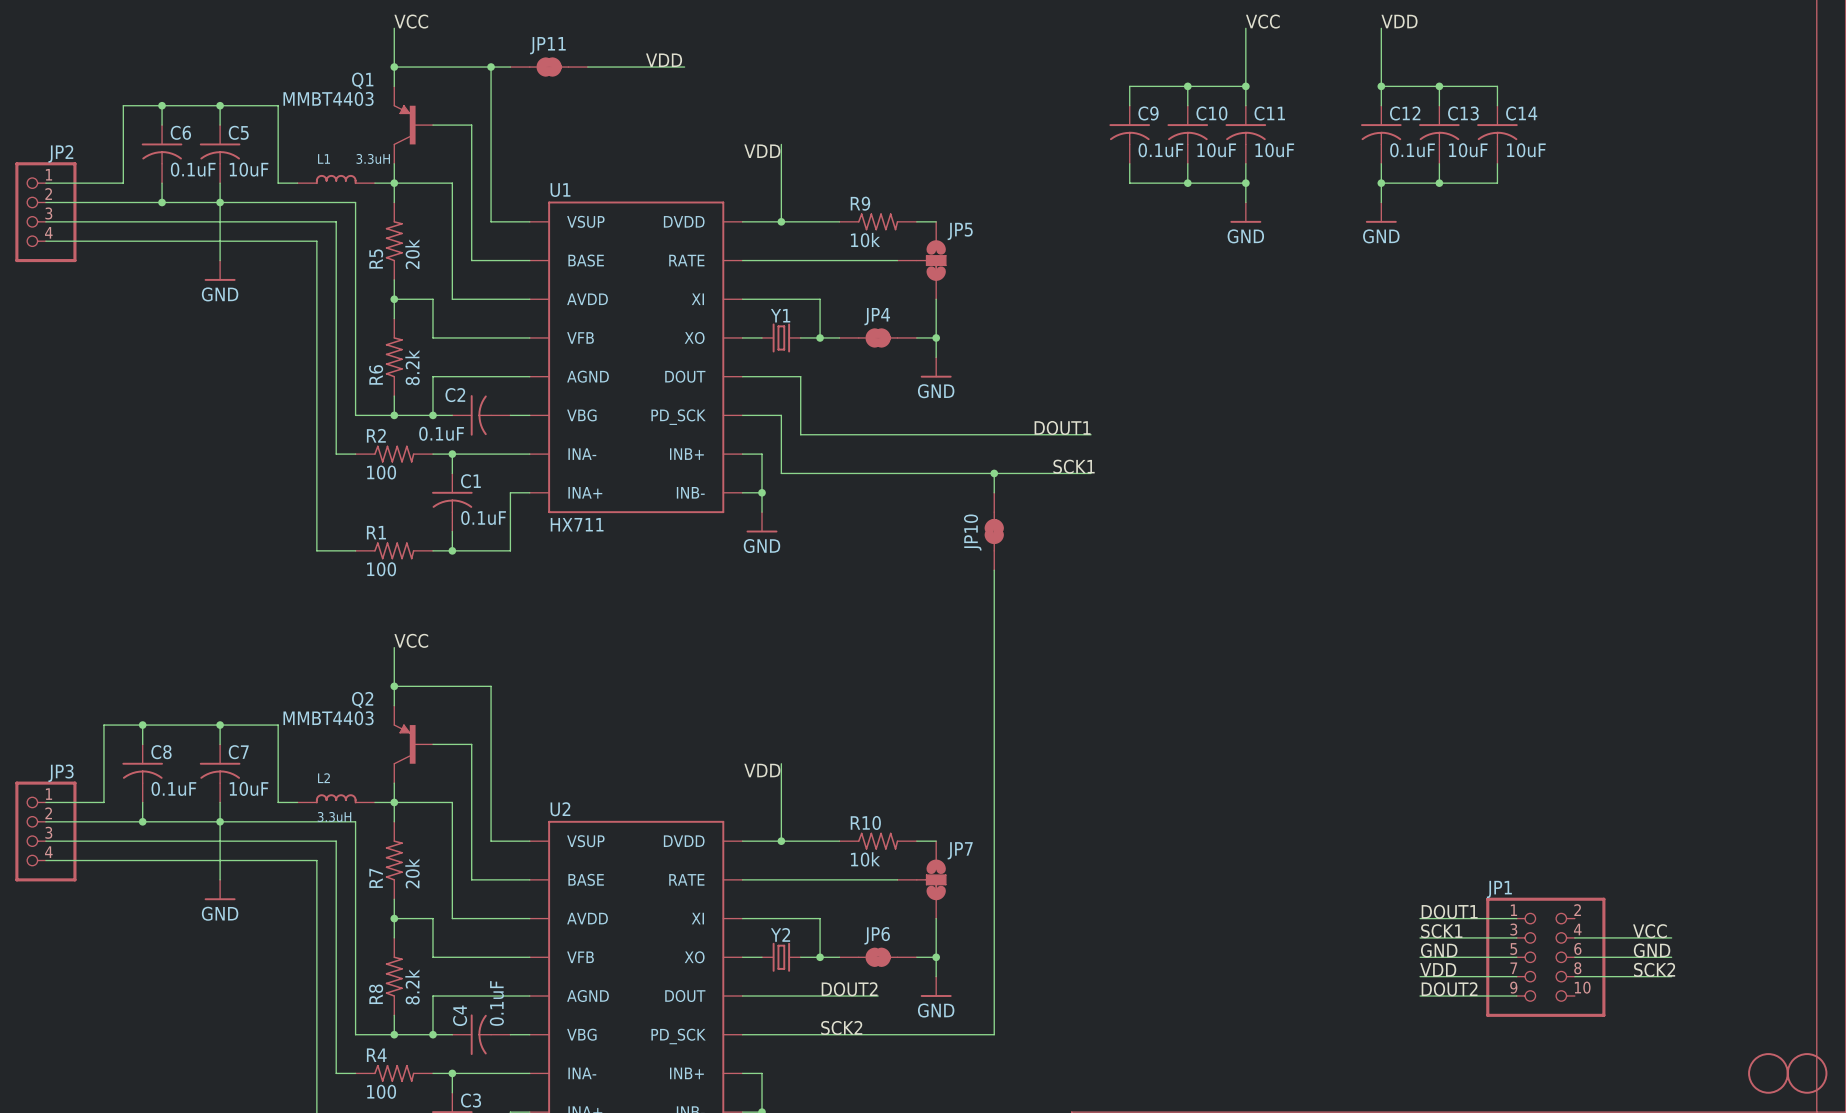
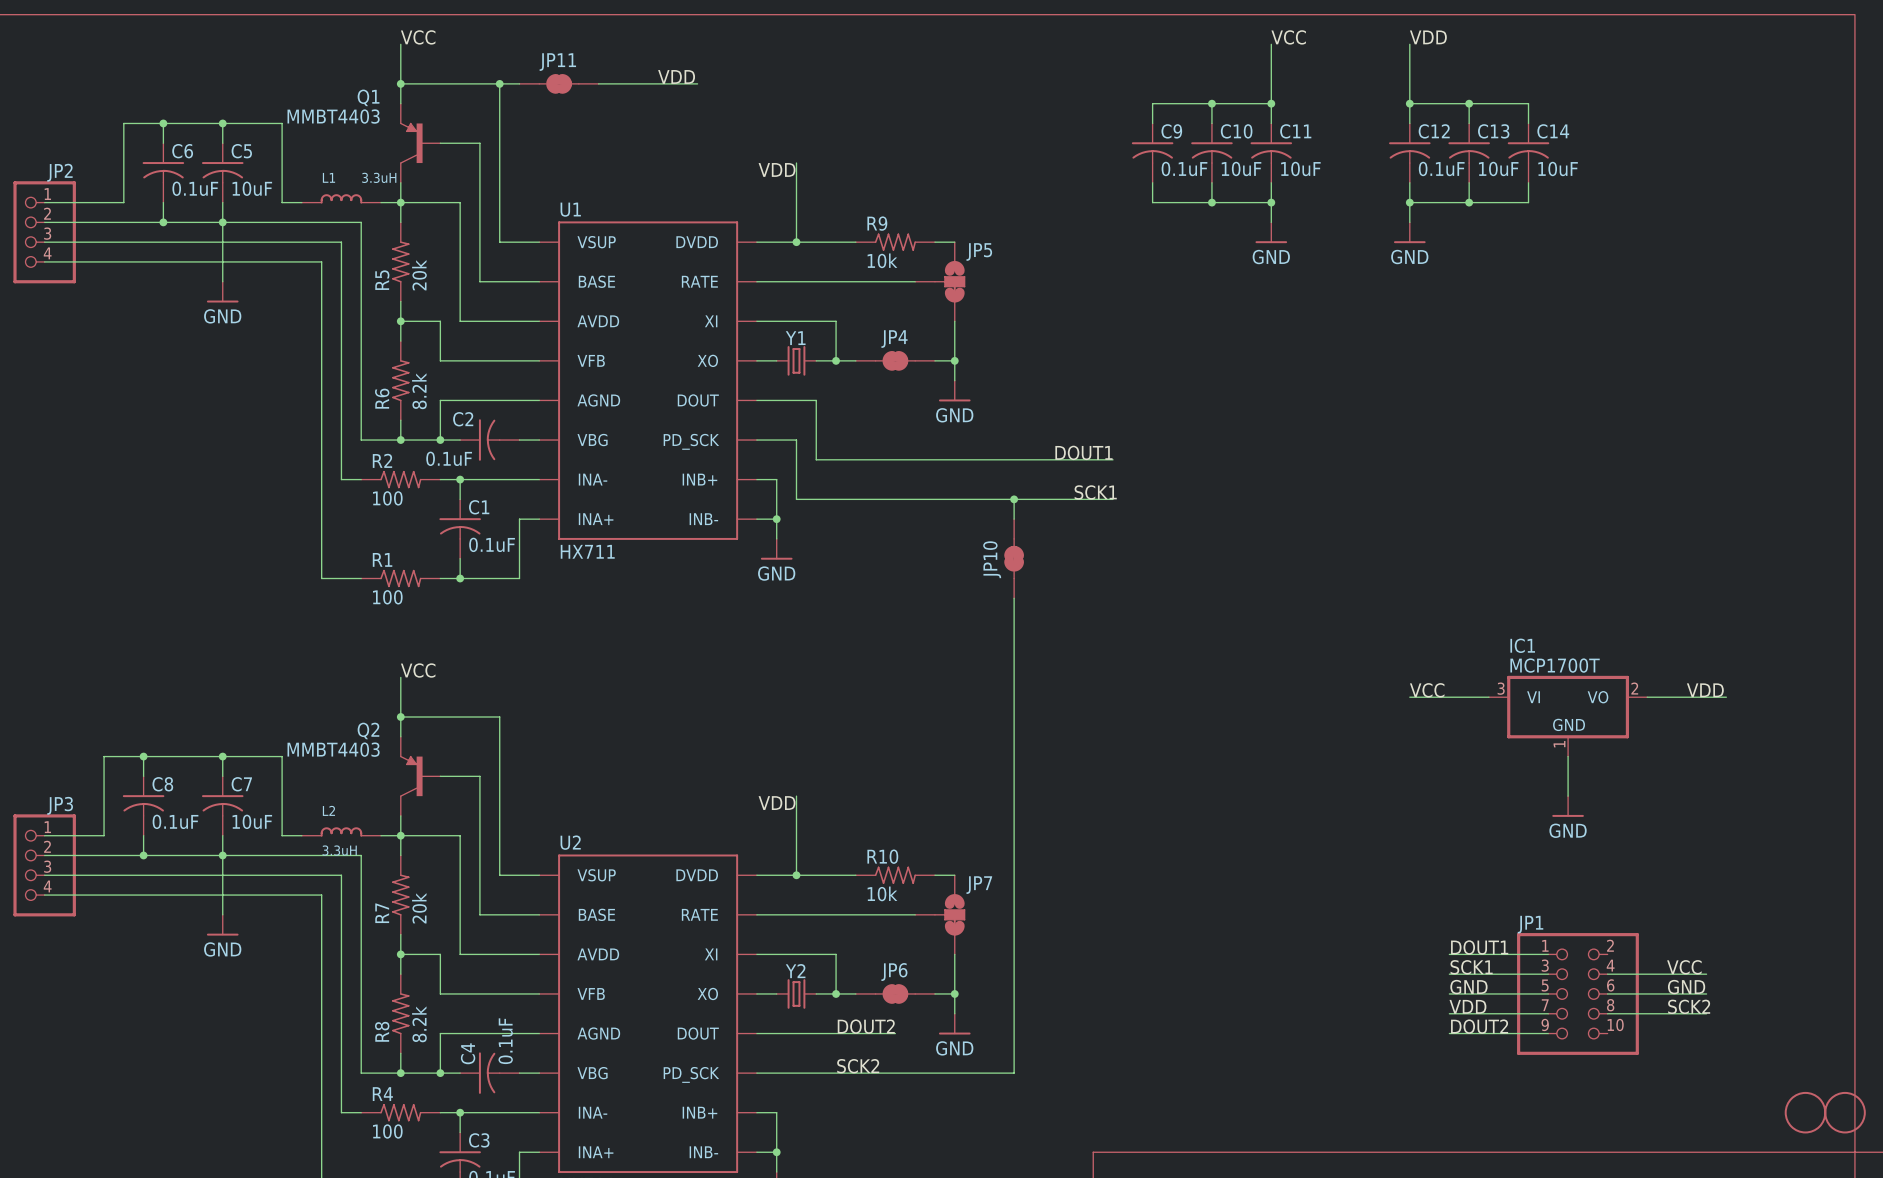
label: none -> VCC (1427, 690)
label: none -> VDD (1705, 690)
wire: none -> (1409, 697) (1488, 697)
wire: none -> (1647, 697) (1726, 697)
IC1: none -> MCP1700T (1568, 716)
wire: none -> (1568, 756) (1568, 796)
power symbol: none -> GND (1568, 806)

